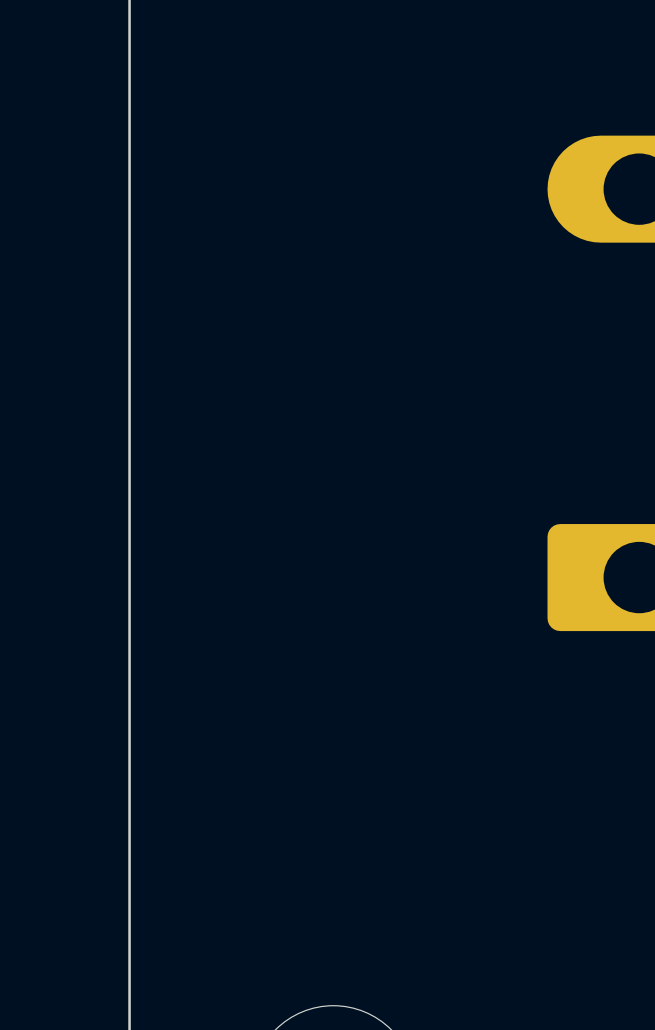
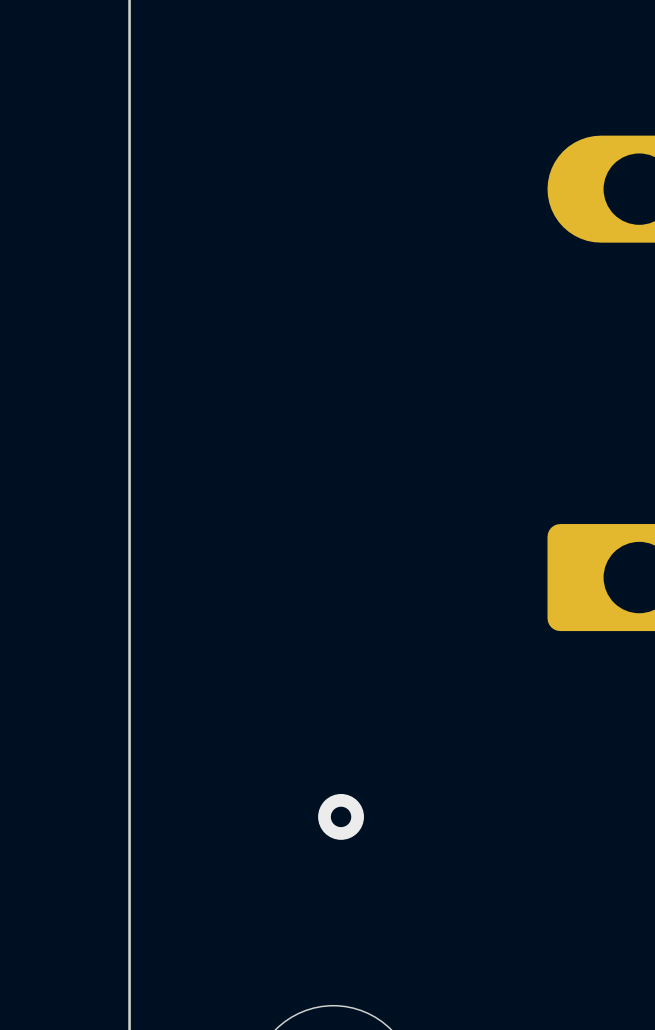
via: none -> (341, 816)

